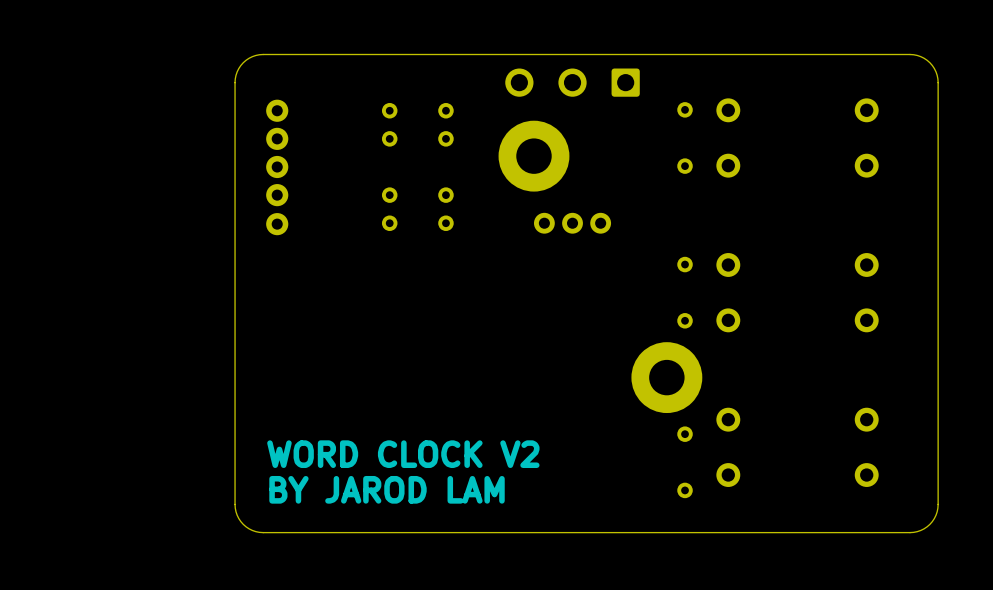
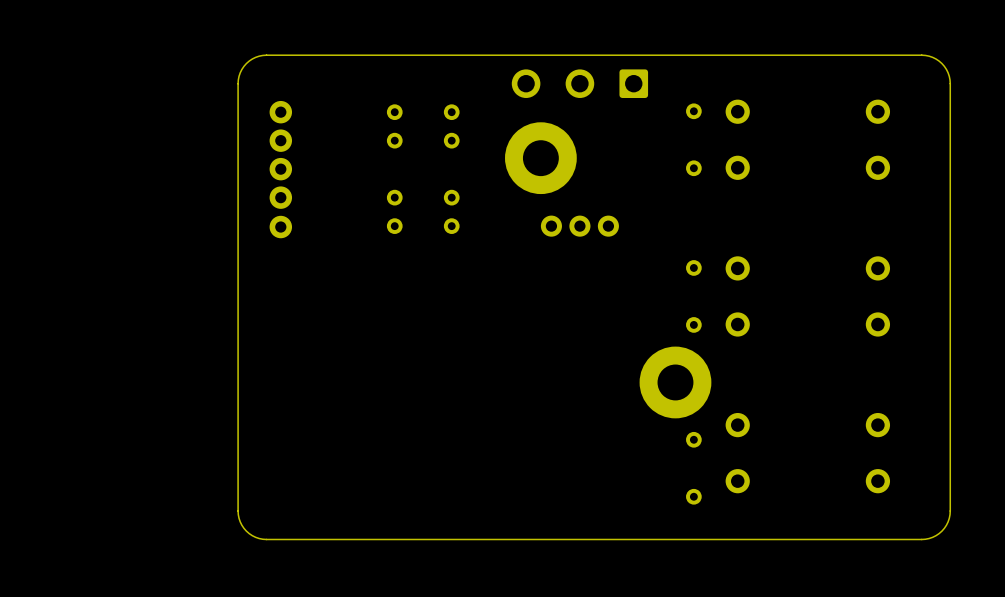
text: WORD CLOCK V2 (403, 454) -> none
text: BY JAROD LAM (387, 489) -> none

